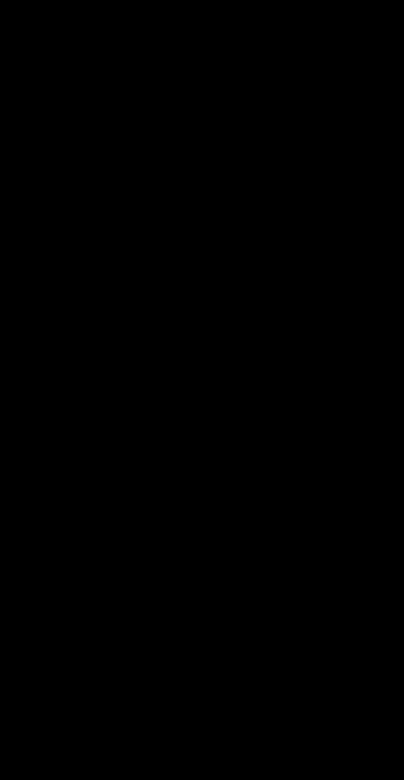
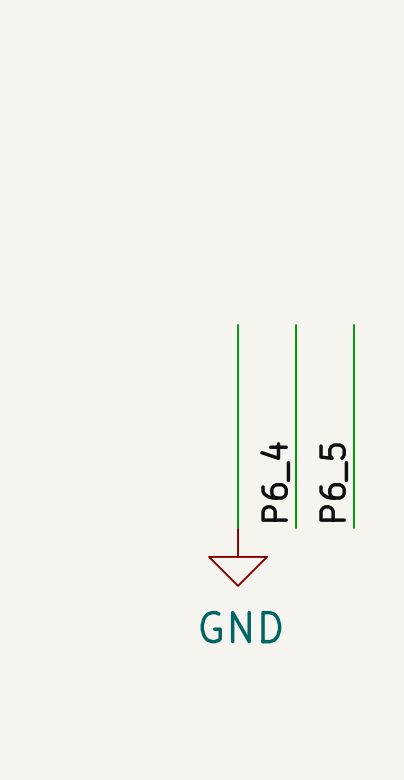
wire: none -> (238, 325) (238, 527)
wire: none -> (296, 325) (296, 527)
wire: none -> (353, 325) (353, 527)
label: none -> P6_4 (275, 482)
label: none -> P6_5 (333, 482)
power symbol: none -> GND (238, 556)

